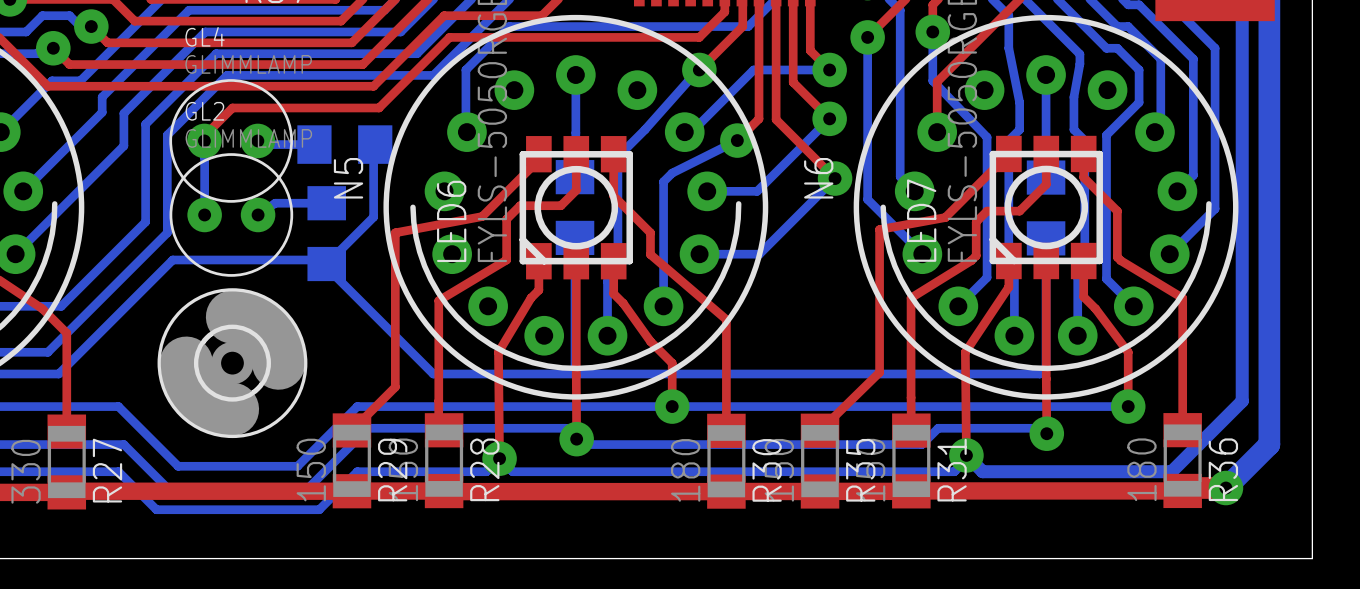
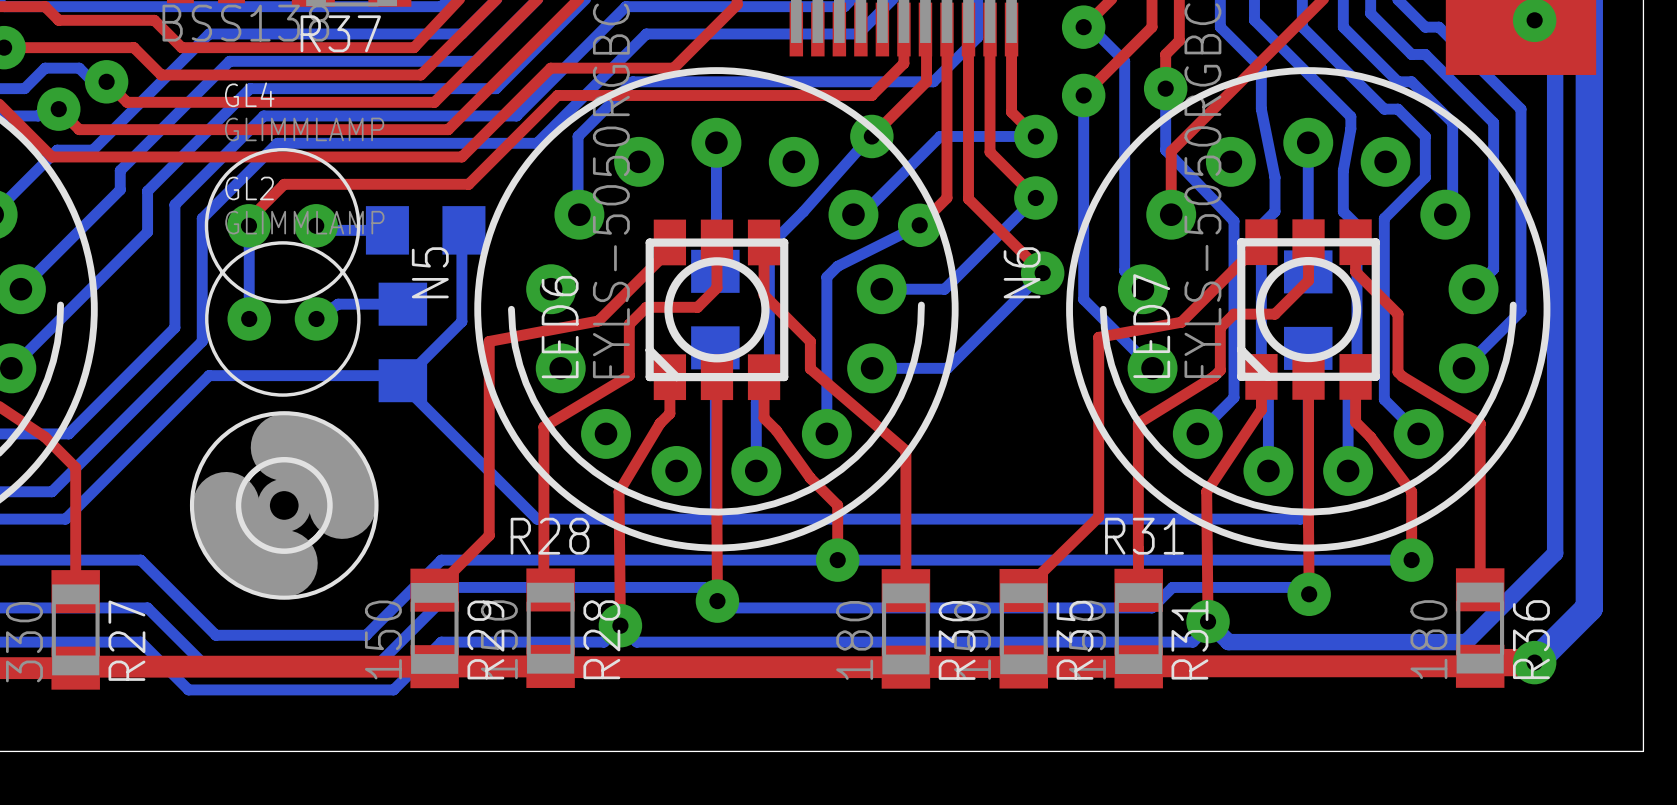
text: none -> R28 (550, 536)
text: none -> R31 (1144, 536)

